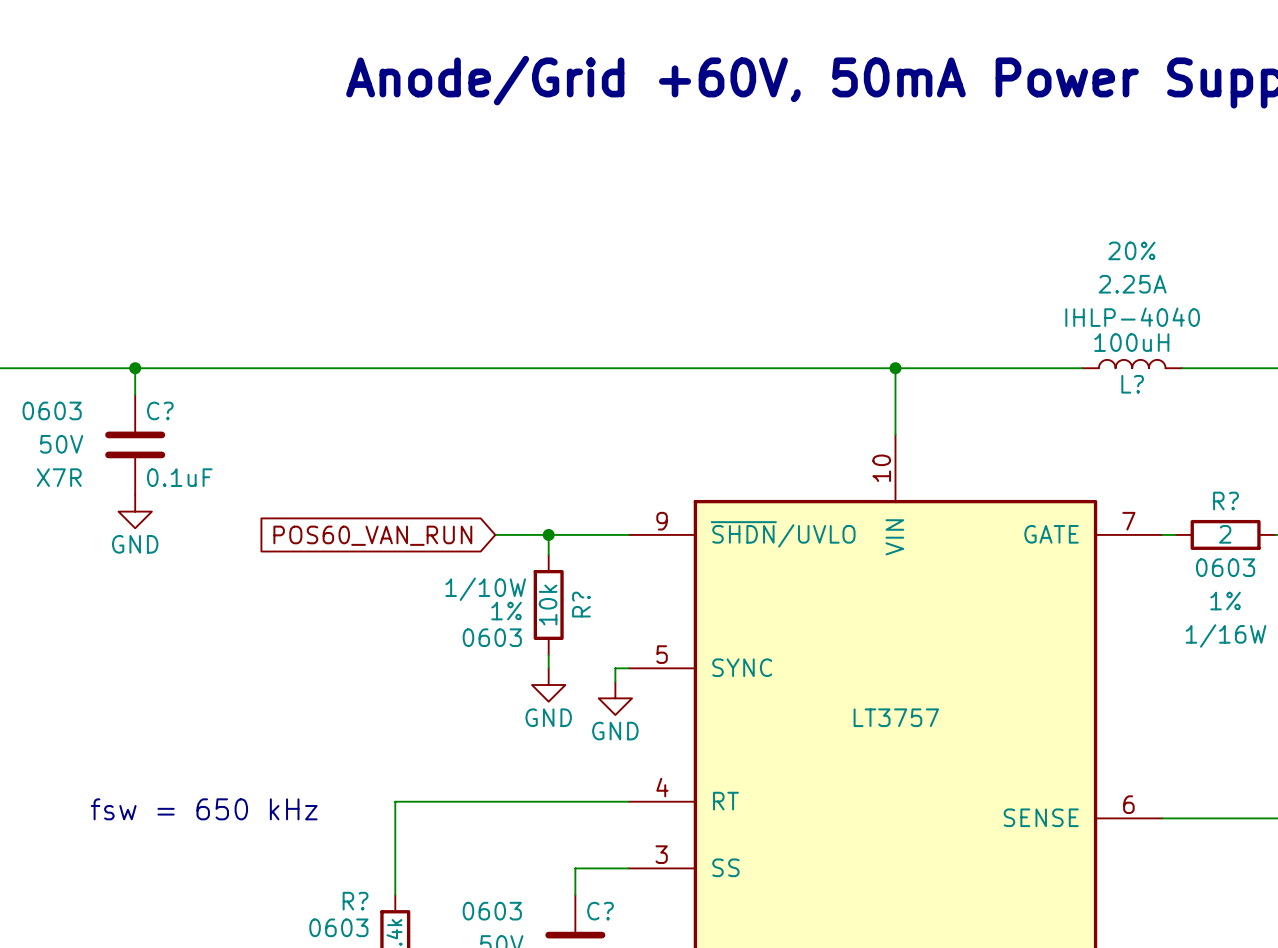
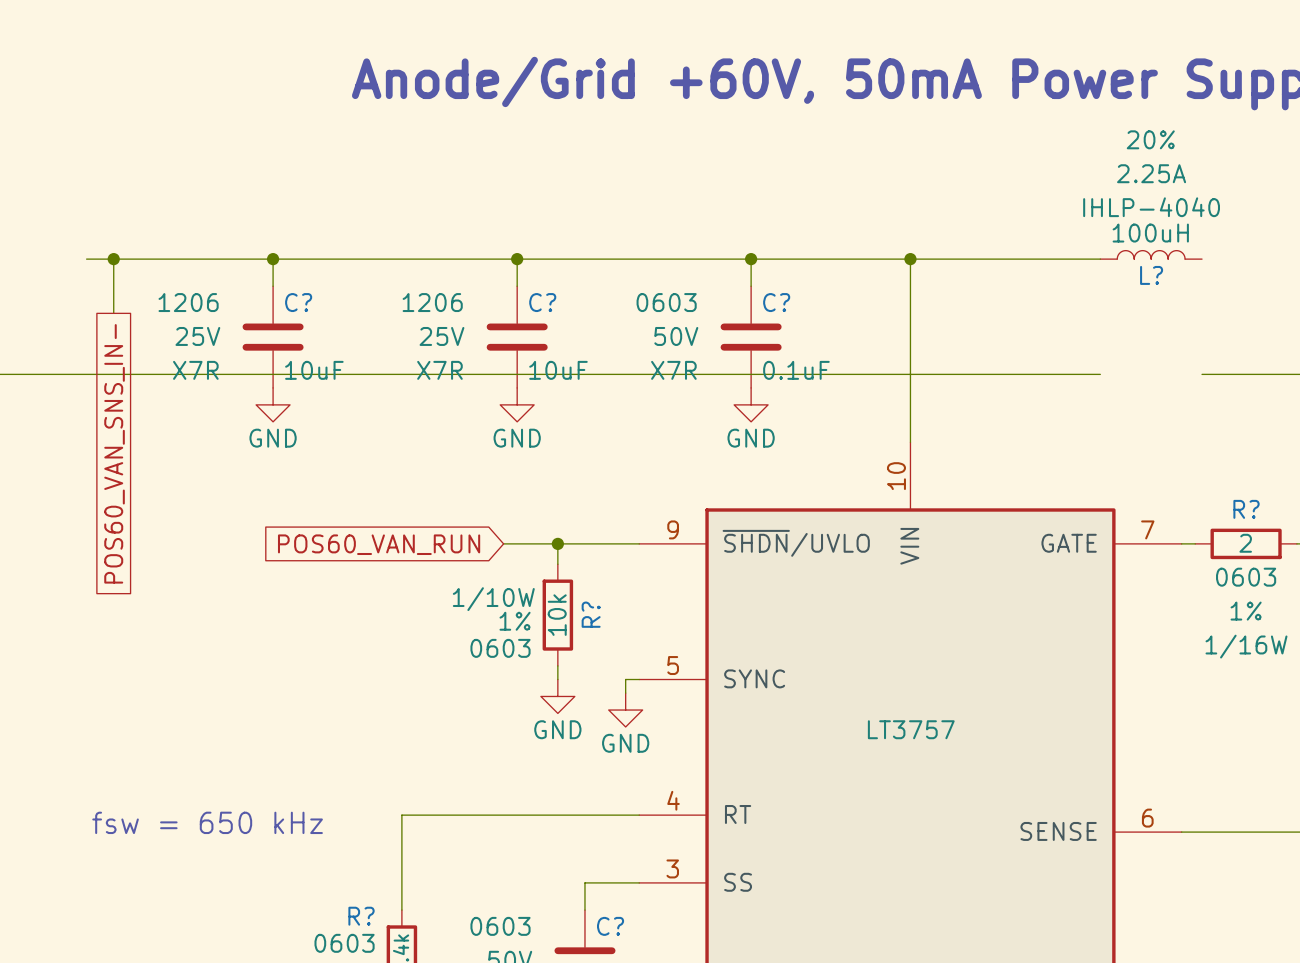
wire: none -> (86, 259) (1100, 259)
wire: none -> (113, 259) (113, 313)
junction: none -> (113, 259)
junction: none -> (273, 259)
wire: none -> (517, 259) (517, 286)
junction: none -> (517, 259)
wire: none -> (751, 259) (751, 286)
junction: none -> (751, 259)
wire: none -> (910, 259) (910, 374)
junction: none -> (910, 259)
C?: none -> 10uF (273, 337)
C?: none -> 10uF (517, 337)
C?: none -> 0.1uF (751, 337)
L? position: (1132, 364) -> (1151, 254)
wire: (135, 368) (135, 394) -> (273, 259) (273, 286)
junction: (135, 368) -> none
junction: (895, 368) -> none
power symbol: none -> GND (517, 404)
power symbol: none -> GND (751, 404)
C?: 0.1uF (135, 444) -> none
global label: none -> POS60_VAN_SNS_IN- (114, 453)
power symbol position: GND (135, 511) -> GND (273, 404)

